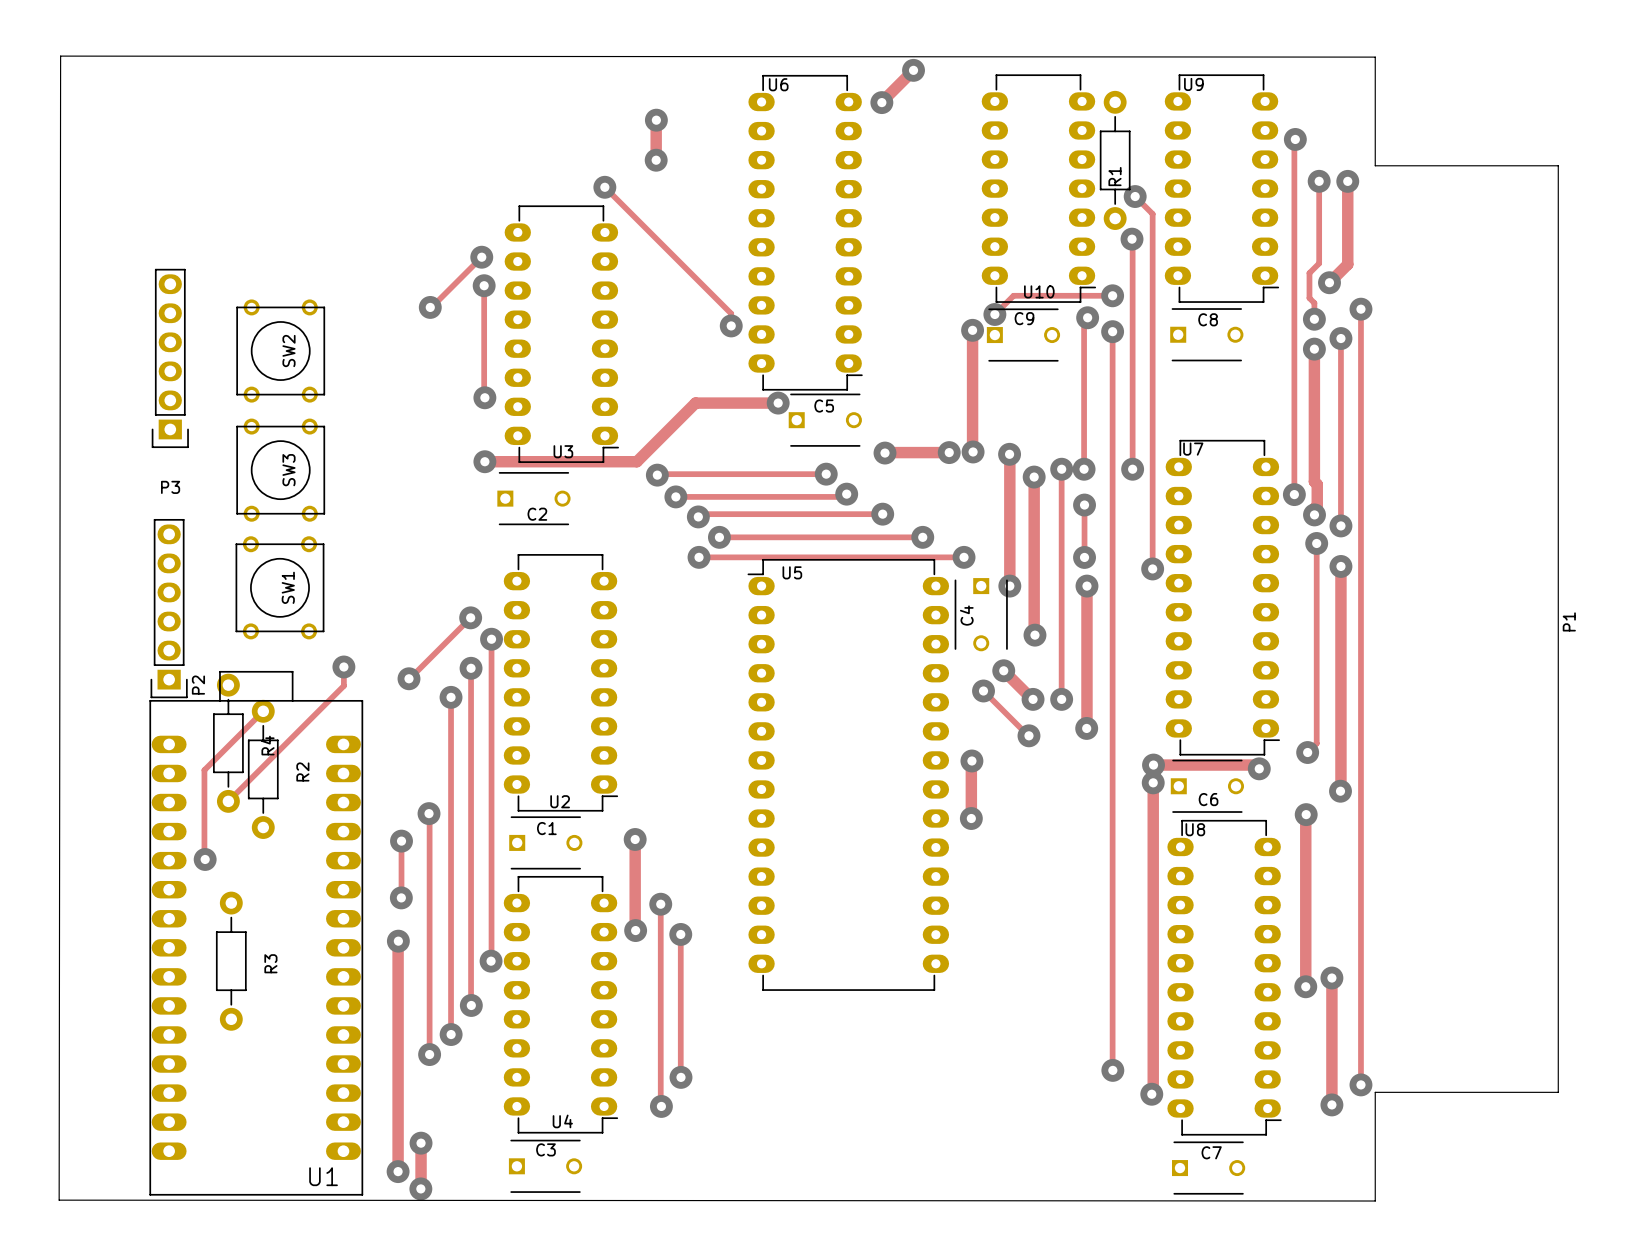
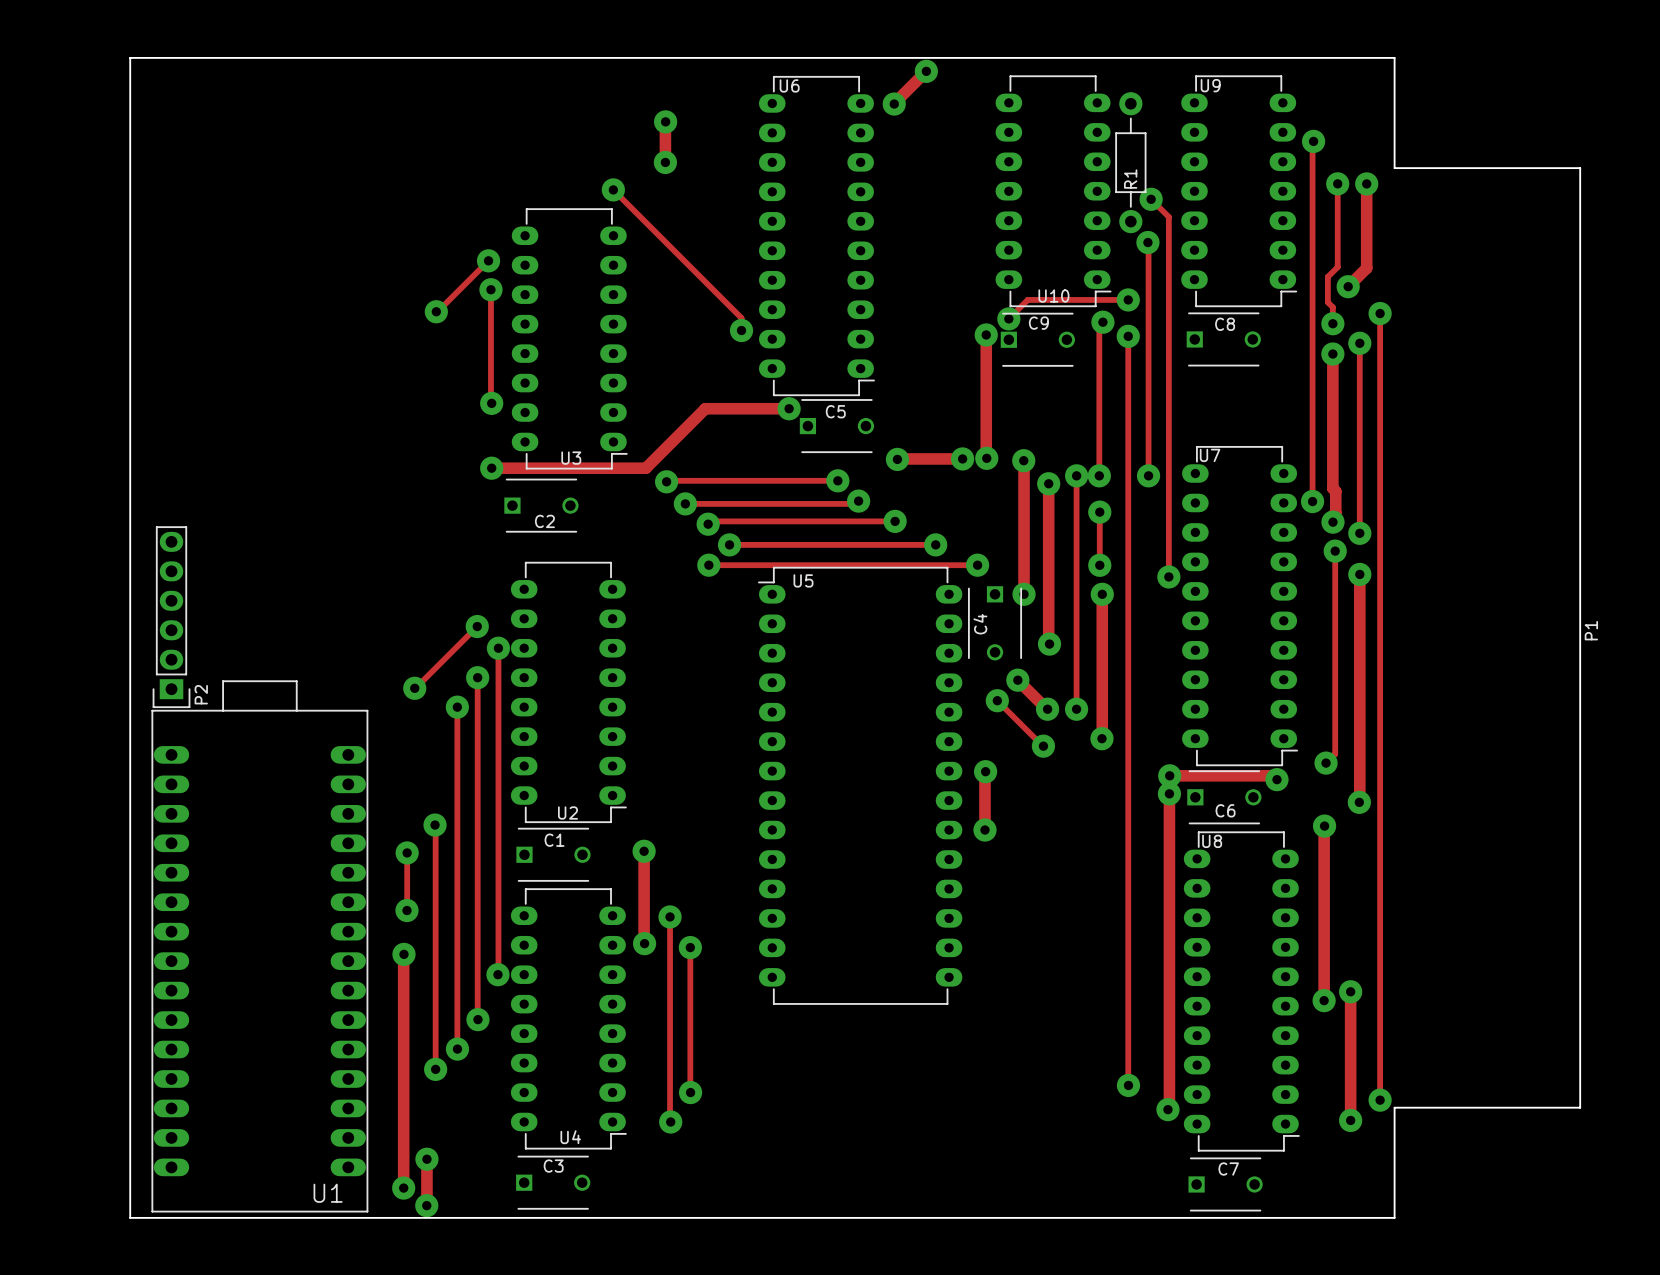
board edge: (1375, 57) (60, 56) (59, 1200) (1375, 1201) -> (1394, 57) (130, 57) (130, 1217) (1394, 1217)
SW2: (280, 351) -> none
P3: (170, 358) -> none
SW3: (280, 470) -> none
SW1: (279, 587) -> none
track: (343, 666) (343, 685) (228, 801) -> none
via: (343, 666) -> none
track: (263, 711) (204, 770) (205, 859) -> none
R4: (228, 743) -> none
R2: (263, 769) -> none
via: (205, 859) -> none
R3: (231, 961) -> none

